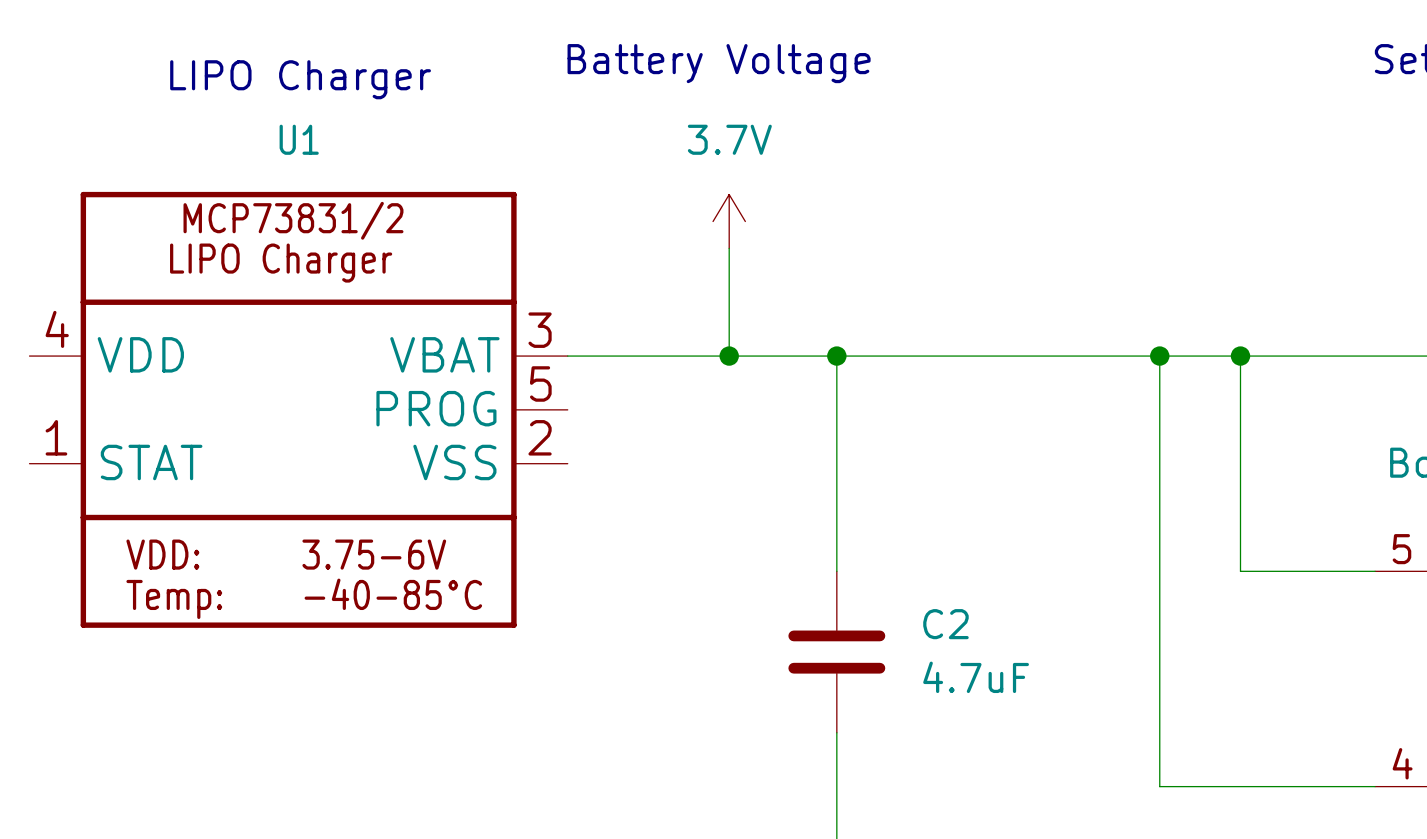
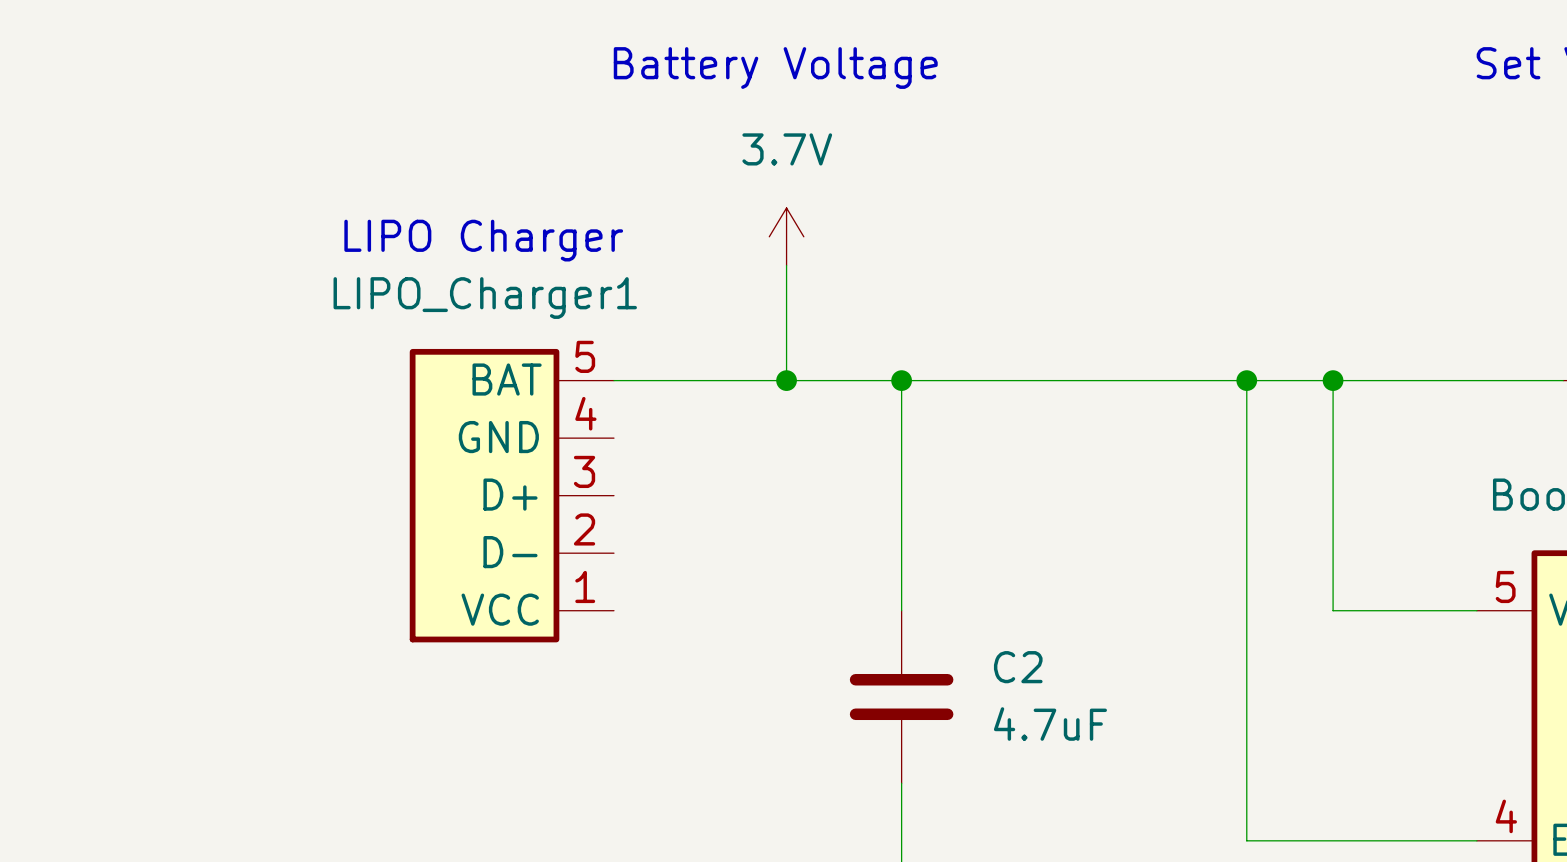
text position: LIPO Charger (300, 79) -> LIPO Charger (483, 240)
U1: (298, 409) -> none
LIPO_Charger1: none -> (511, 495)

